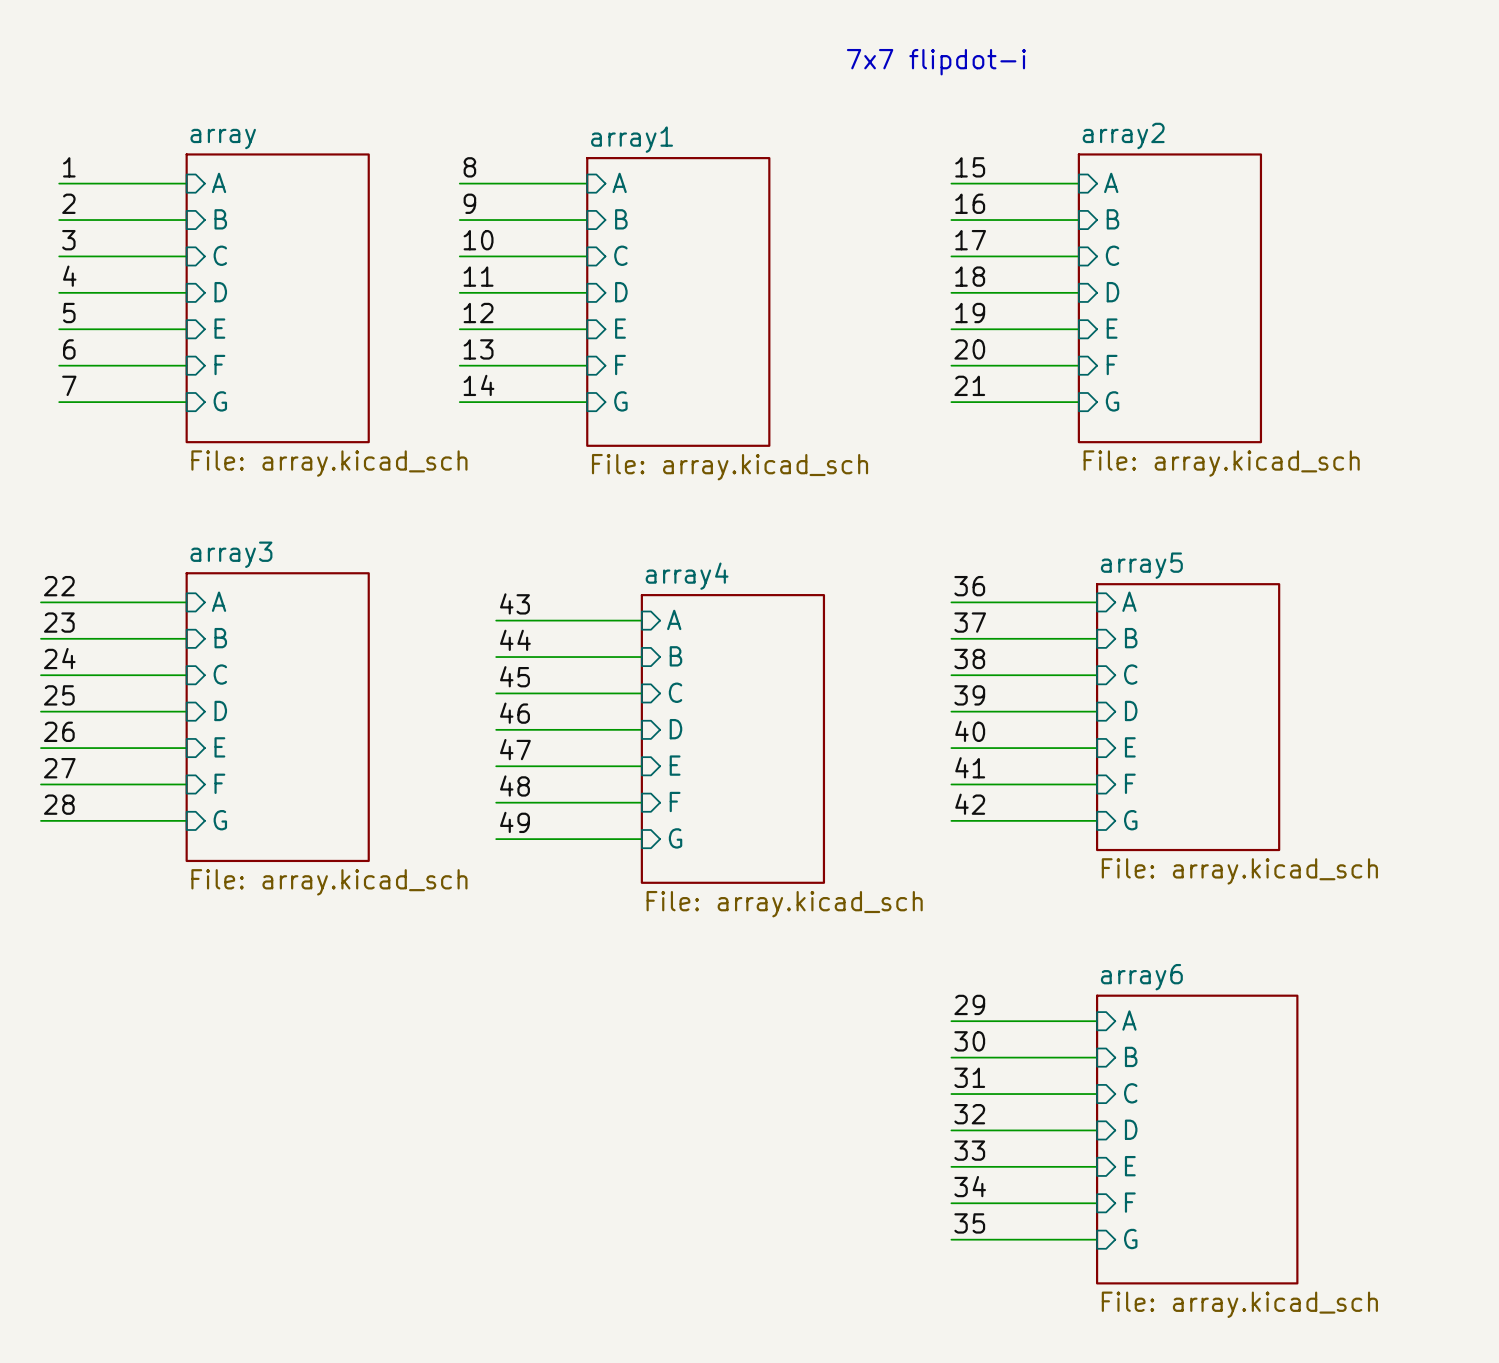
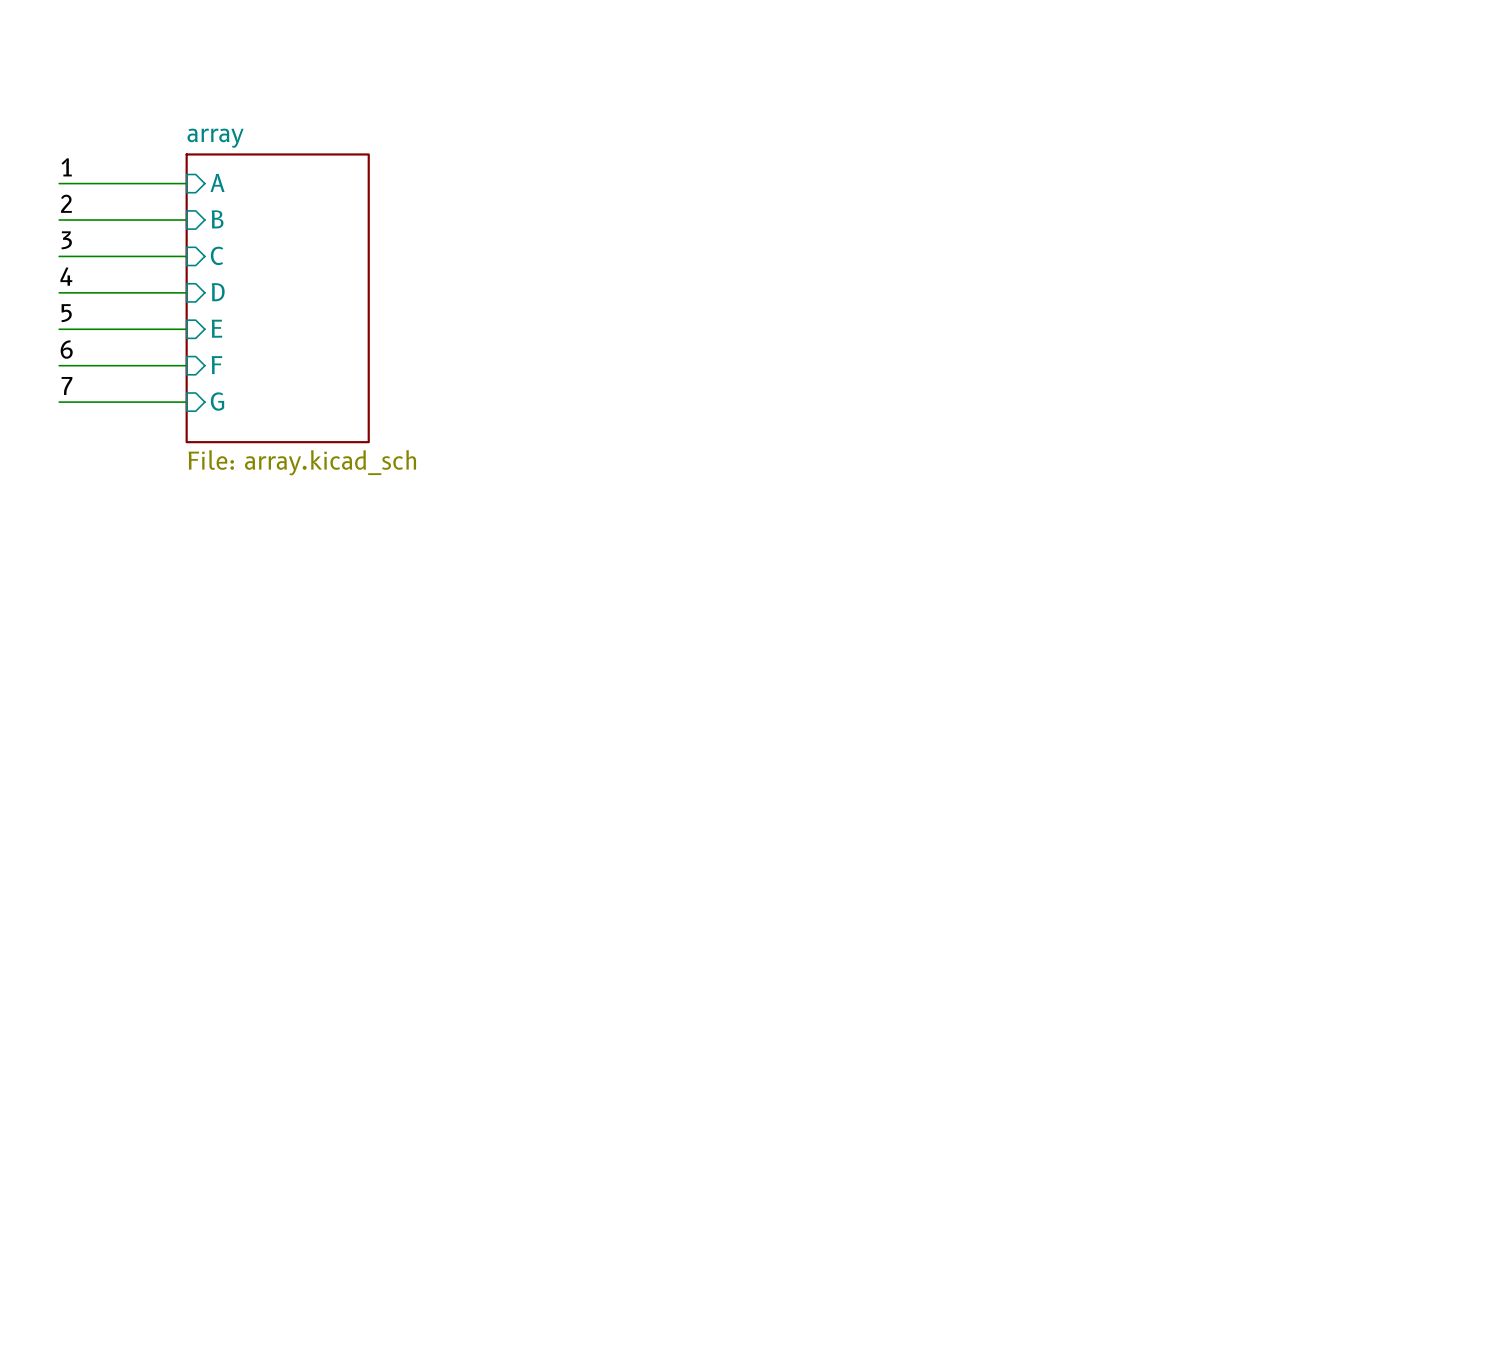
text: 7x7 flipdot-i (936, 62) -> none
label: 8 (469, 167) -> none
label: 15 (970, 167) -> none
sheet pin: A (619, 182) -> none
sheet pin: A (1111, 182) -> none
wire: (459, 183) (587, 183) -> none
wire: (951, 183) (1078, 183) -> none
label: 9 (469, 203) -> none
label: 16 (970, 203) -> none
sheet pin: B (621, 219) -> none
sheet pin: B (1112, 219) -> none
wire: (459, 220) (587, 220) -> none
wire: (951, 220) (1078, 220) -> none
label: 10 (478, 240) -> none
label: 17 (970, 240) -> none
sheet pin: C (620, 255) -> none
sheet pin: C (1112, 255) -> none
wire: (459, 256) (587, 256) -> none
wire: (951, 256) (1078, 256) -> none
label: 11 (478, 276) -> none
label: 18 (970, 276) -> none
wire: (459, 292) (587, 292) -> none
sheet pin: D (621, 292) -> none
wire: (951, 292) (1078, 292) -> none
sheet pin: D (1112, 292) -> none
sheet array2: File: array.kicad_sch (1169, 298) -> none
sheet array1: File: array.kicad_sch (678, 301) -> none
label: 12 (478, 313) -> none
label: 19 (970, 313) -> none
sheet pin: E (620, 328) -> none
sheet pin: E (1112, 328) -> none
wire: (459, 329) (587, 329) -> none
wire: (951, 329) (1078, 329) -> none
label: 13 (478, 349) -> none
label: 20 (969, 349) -> none
wire: (459, 365) (587, 365) -> none
sheet pin: F (620, 365) -> none
wire: (951, 365) (1078, 365) -> none
sheet pin: F (1112, 365) -> none
label: 14 (479, 385) -> none
label: 21 (969, 385) -> none
sheet pin: G (620, 401) -> none
sheet pin: G (1112, 401) -> none
wire: (459, 402) (587, 402) -> none
wire: (951, 402) (1078, 402) -> none
label: 22 (59, 586) -> none
label: 36 (969, 586) -> none
sheet pin: A (219, 601) -> none
sheet pin: A (1129, 601) -> none
wire: (40, 602) (186, 602) -> none
wire: (951, 602) (1097, 602) -> none
label: 43 (514, 603) -> none
sheet pin: A (674, 619) -> none
wire: (496, 620) (641, 620) -> none
label: 23 (59, 622) -> none
label: 37 (970, 622) -> none
wire: (40, 638) (186, 638) -> none
sheet pin: B (220, 638) -> none
wire: (951, 638) (1097, 638) -> none
sheet pin: B (1131, 638) -> none
label: 44 (515, 640) -> none
sheet pin: B (675, 656) -> none
wire: (496, 657) (641, 657) -> none
label: 24 (59, 658) -> none
label: 38 (969, 658) -> none
sheet pin: C (220, 674) -> none
sheet pin: C (1130, 674) -> none
wire: (40, 675) (186, 675) -> none
wire: (951, 675) (1097, 675) -> none
label: 45 (514, 676) -> none
sheet pin: C (675, 692) -> none
wire: (496, 693) (641, 693) -> none
label: 25 (59, 695) -> none
label: 39 (969, 695) -> none
sheet pin: D (220, 710) -> none
sheet pin: D (1131, 710) -> none
wire: (40, 711) (186, 711) -> none
wire: (951, 711) (1097, 711) -> none
label: 46 (514, 713) -> none
sheet array3: File: array.kicad_sch (277, 717) -> none
sheet array5: File: array.kicad_sch (1188, 717) -> none
wire: (496, 729) (641, 729) -> none
sheet pin: D (675, 729) -> none
label: 26 (59, 731) -> none
label: 40 (970, 731) -> none
sheet array4: File: array.kicad_sch (732, 738) -> none
sheet pin: E (219, 747) -> none
sheet pin: E (1130, 747) -> none
wire: (40, 748) (186, 748) -> none
wire: (951, 748) (1097, 748) -> none
label: 47 (515, 749) -> none
sheet pin: E (675, 765) -> none
wire: (496, 766) (641, 766) -> none
label: 41 (970, 767) -> none
label: 27 (59, 768) -> none
sheet pin: F (219, 783) -> none
sheet pin: F (1130, 783) -> none
wire: (40, 784) (186, 784) -> none
wire: (951, 784) (1097, 784) -> none
label: 48 (514, 786) -> none
wire: (496, 802) (641, 802) -> none
sheet pin: F (675, 802) -> none
label: 28 (59, 804) -> none
label: 42 (970, 804) -> none
wire: (40, 820) (186, 820) -> none
sheet pin: G (220, 820) -> none
wire: (951, 820) (1097, 820) -> none
sheet pin: G (1130, 820) -> none
label: 49 (514, 822) -> none
sheet pin: G (675, 838) -> none
wire: (496, 839) (641, 839) -> none
label: 29 (969, 1004) -> none
sheet pin: A (1129, 1020) -> none
wire: (951, 1021) (1097, 1021) -> none
label: 30 (969, 1041) -> none
sheet pin: B (1131, 1056) -> none
wire: (951, 1057) (1097, 1057) -> none
label: 31 (969, 1077) -> none
sheet pin: C (1130, 1093) -> none
wire: (951, 1094) (1097, 1094) -> none
label: 32 (969, 1114) -> none
sheet pin: D (1131, 1129) -> none
wire: (951, 1130) (1097, 1130) -> none
sheet array6: File: array.kicad_sch (1197, 1139) -> none
label: 33 (969, 1150) -> none
wire: (951, 1166) (1097, 1166) -> none
sheet pin: E (1130, 1166) -> none
label: 34 (970, 1186) -> none
sheet pin: F (1130, 1202) -> none
wire: (951, 1203) (1097, 1203) -> none
label: 35 (969, 1223) -> none
wire: (951, 1239) (1097, 1239) -> none
sheet pin: G (1130, 1239) -> none

